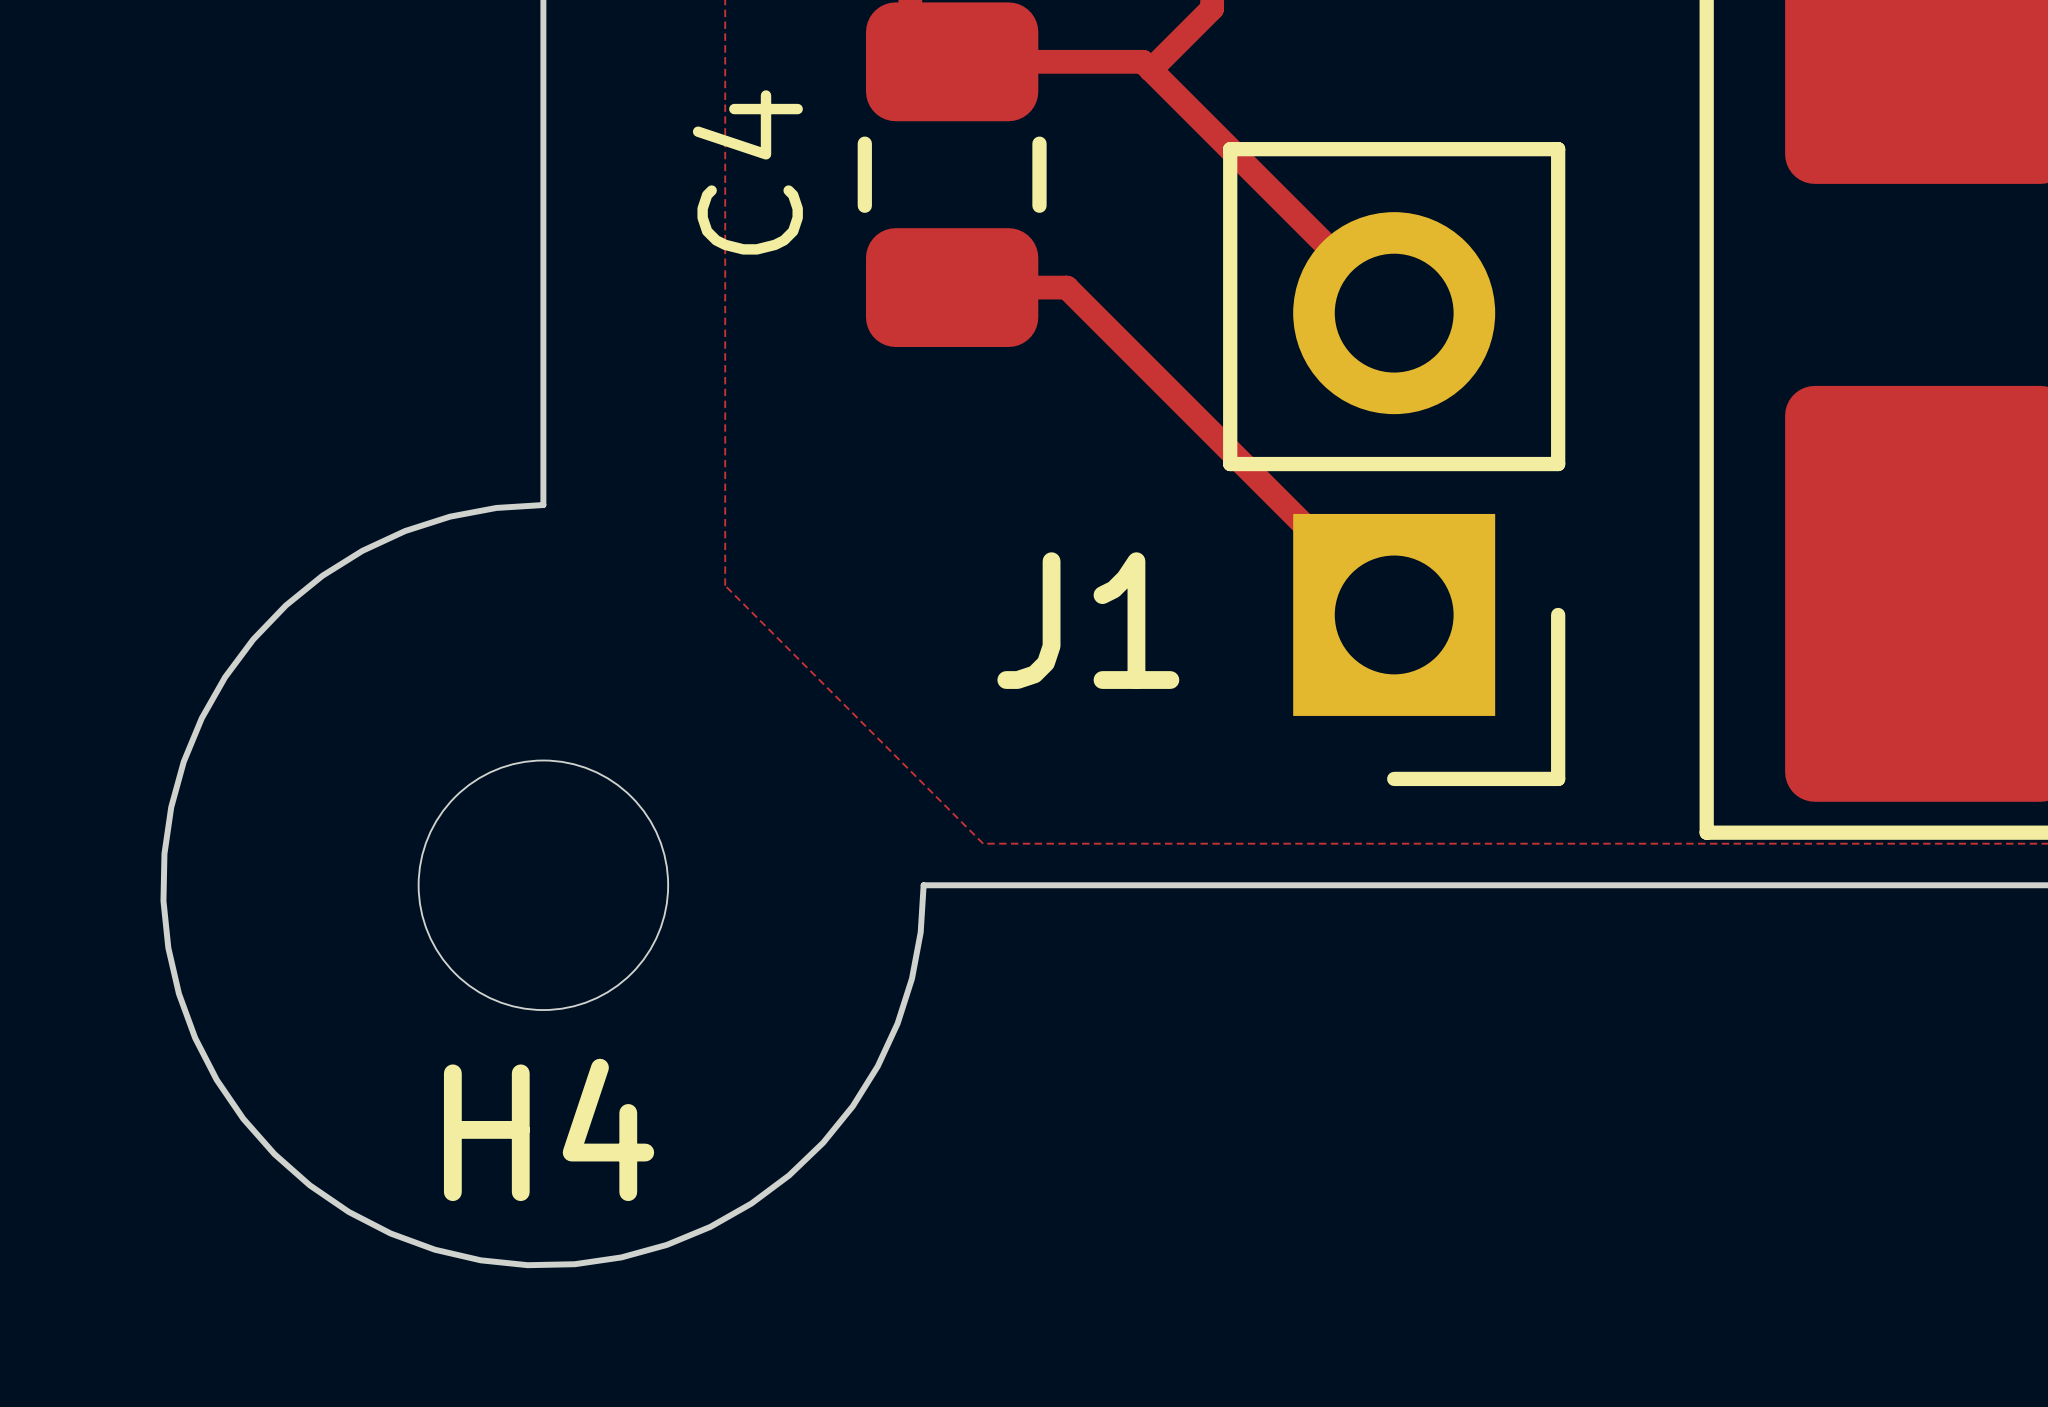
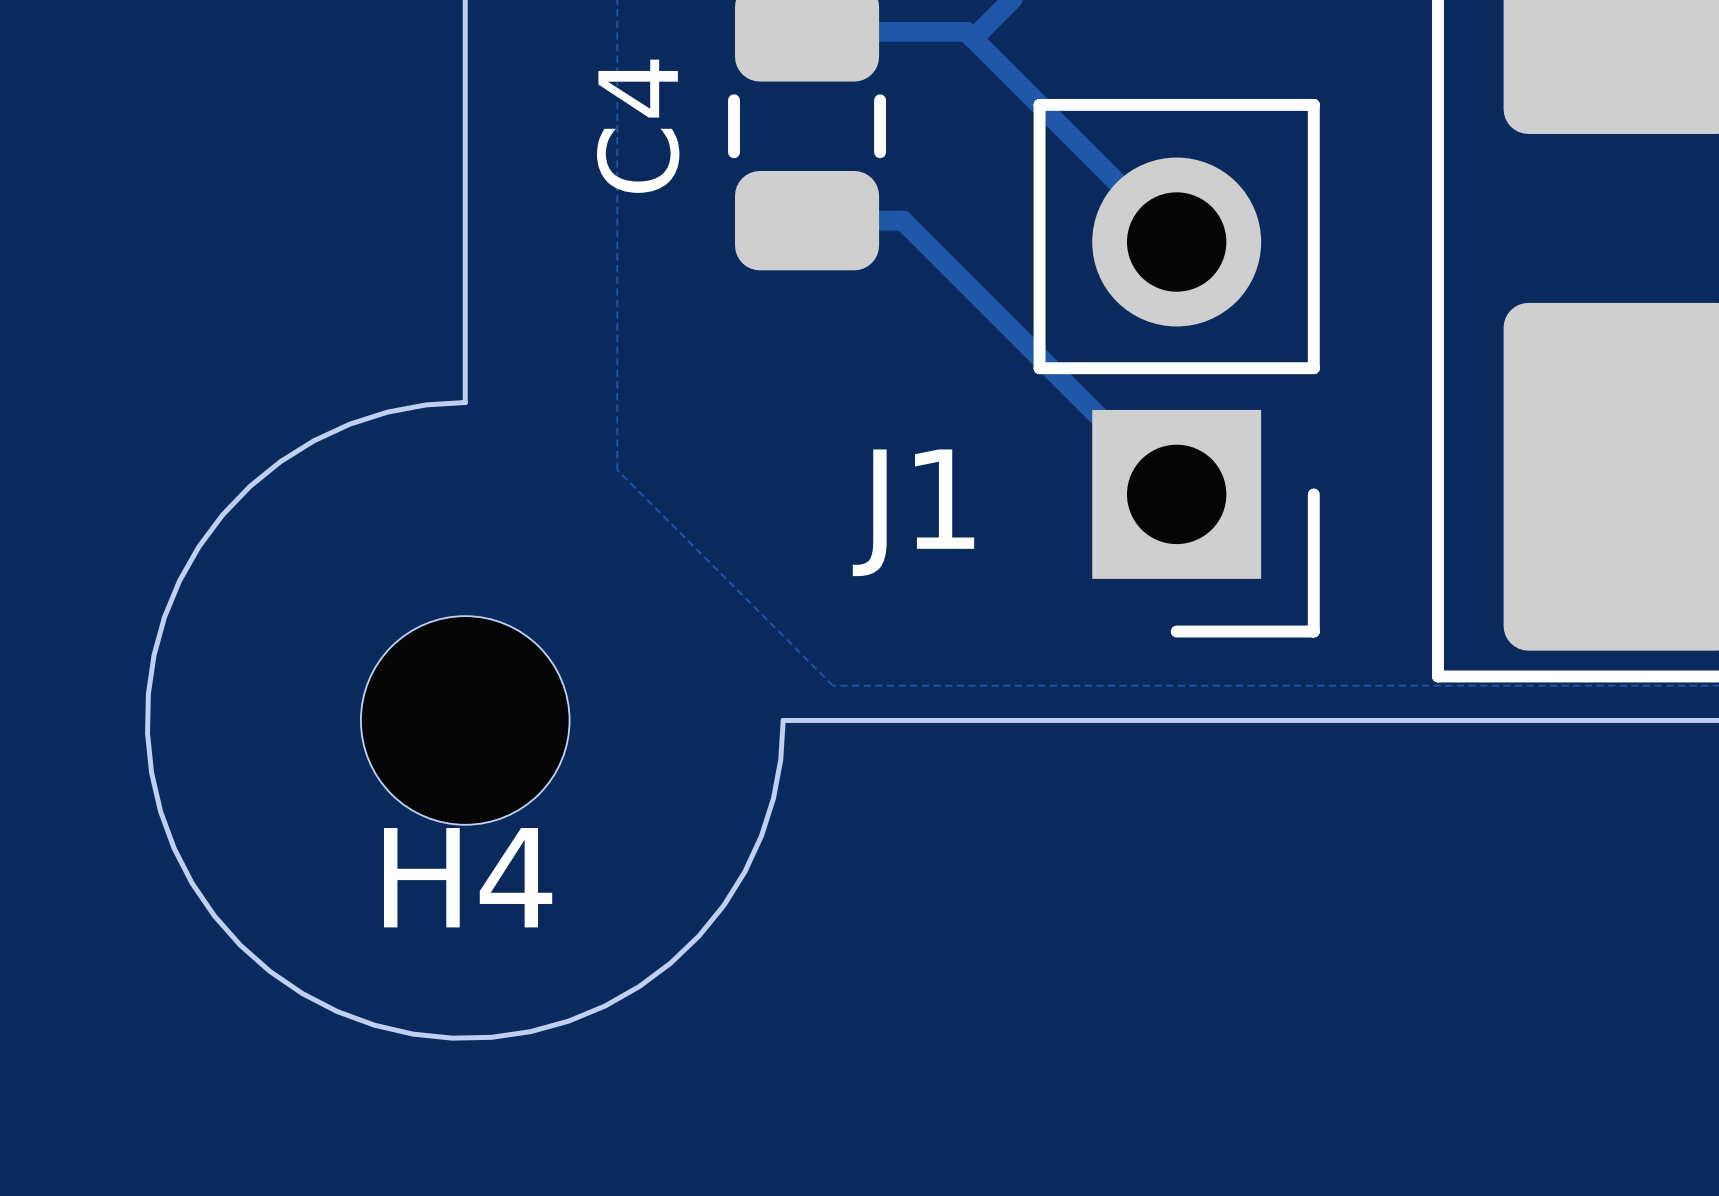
H4 name position: H4 (549, 1129) -> H4 (468, 877)

